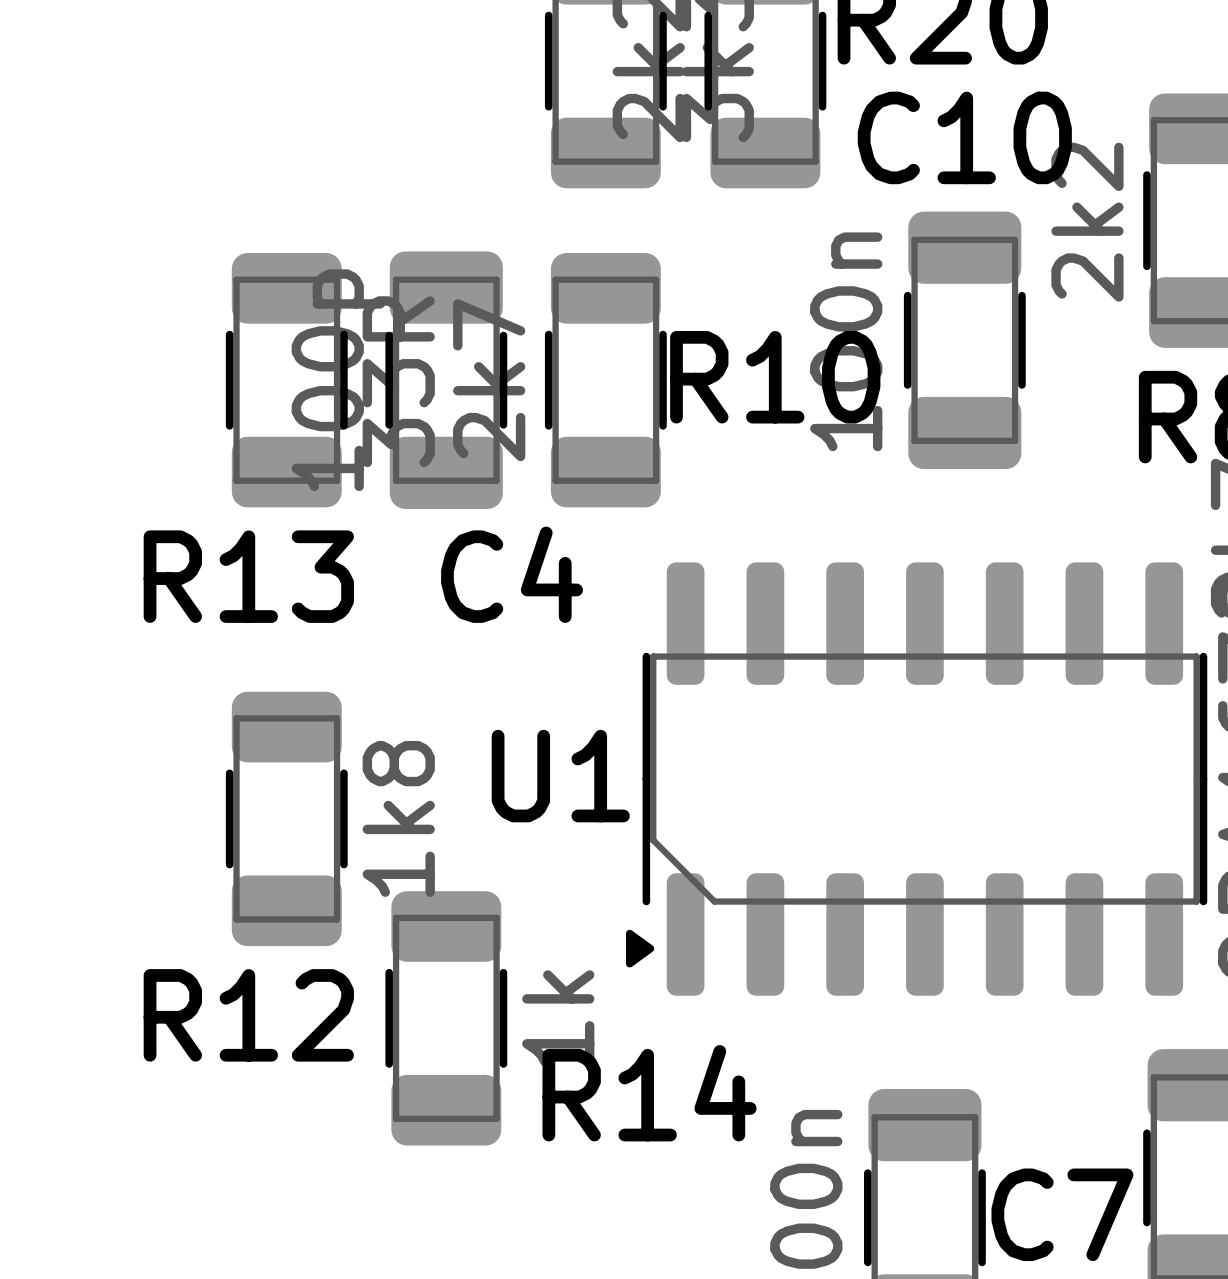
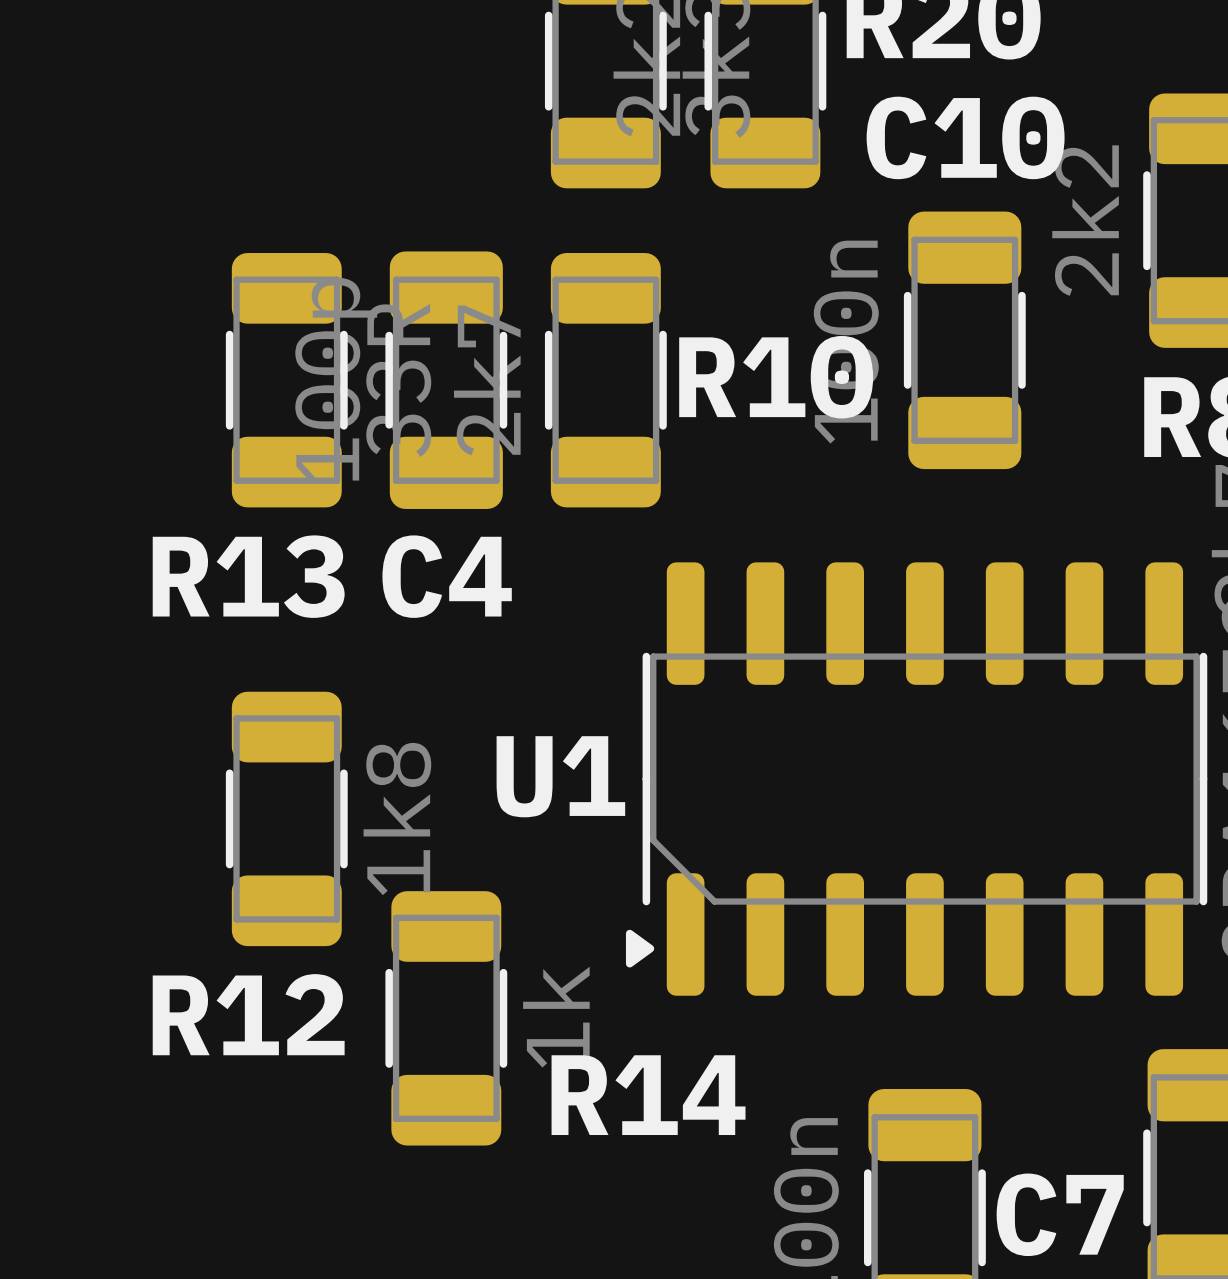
C4 name position: C4 (512, 574) -> C4 (447, 576)

